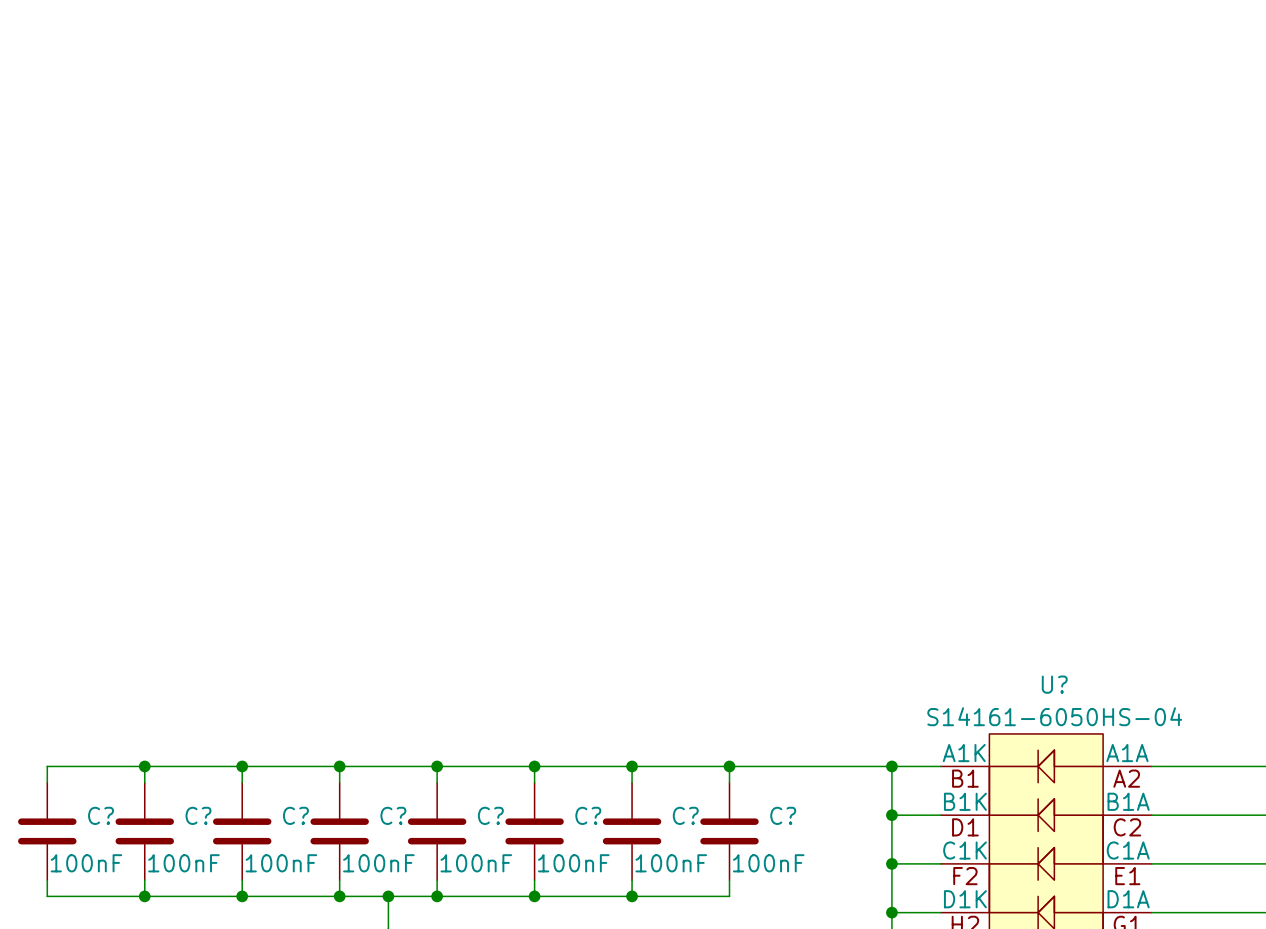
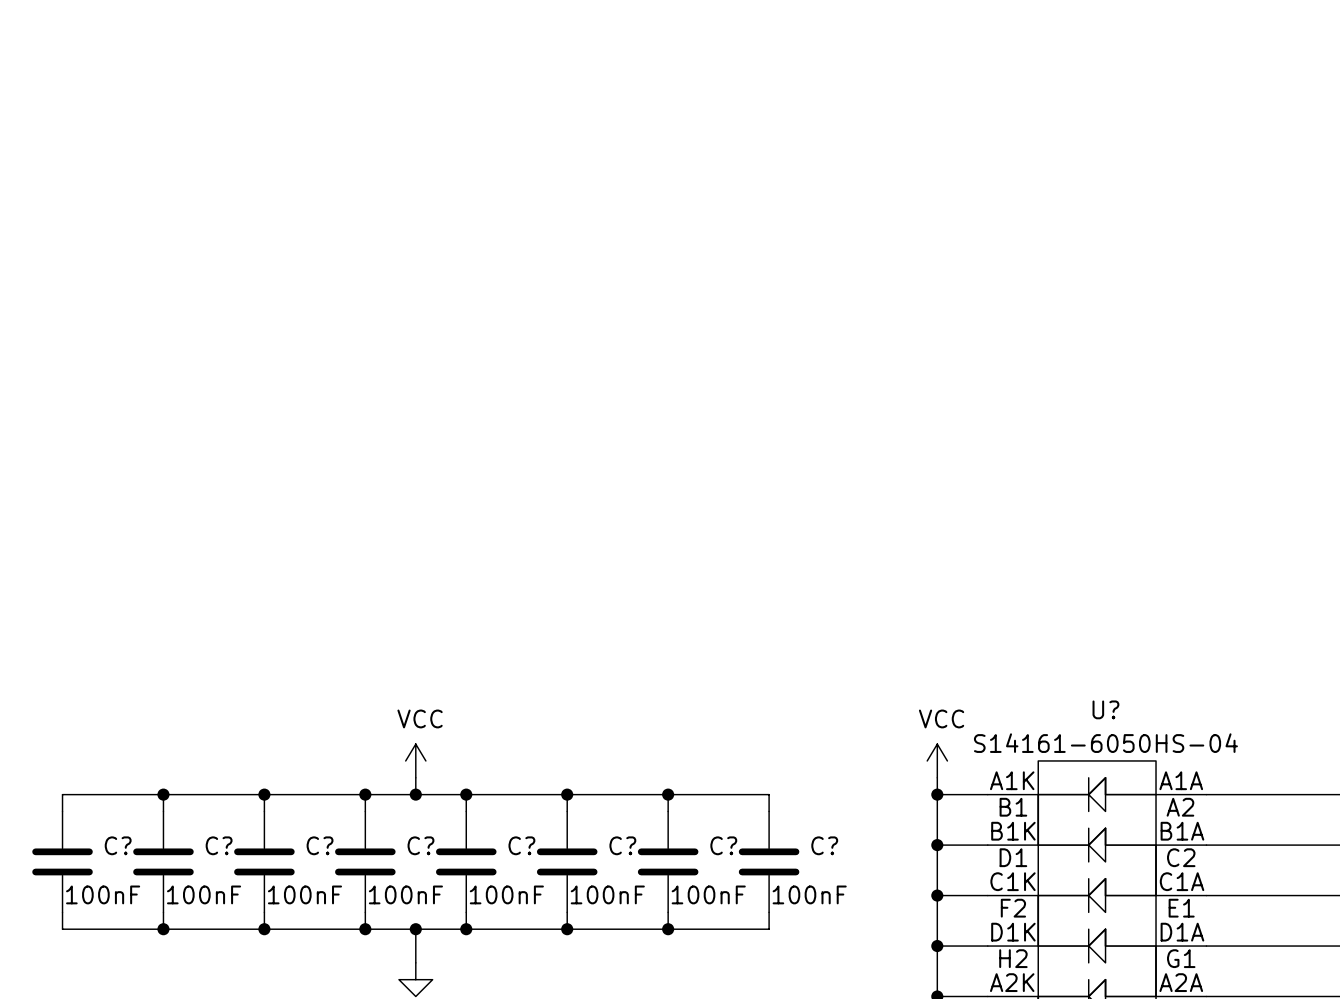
power symbol: none -> VCC (415, 760)
power symbol: none -> VCC (937, 760)
wire: none -> (415, 777) (415, 794)
junction: none -> (415, 794)
wire: (729, 766) (891, 766) -> (937, 777) (937, 794)
junction: (729, 766) -> none

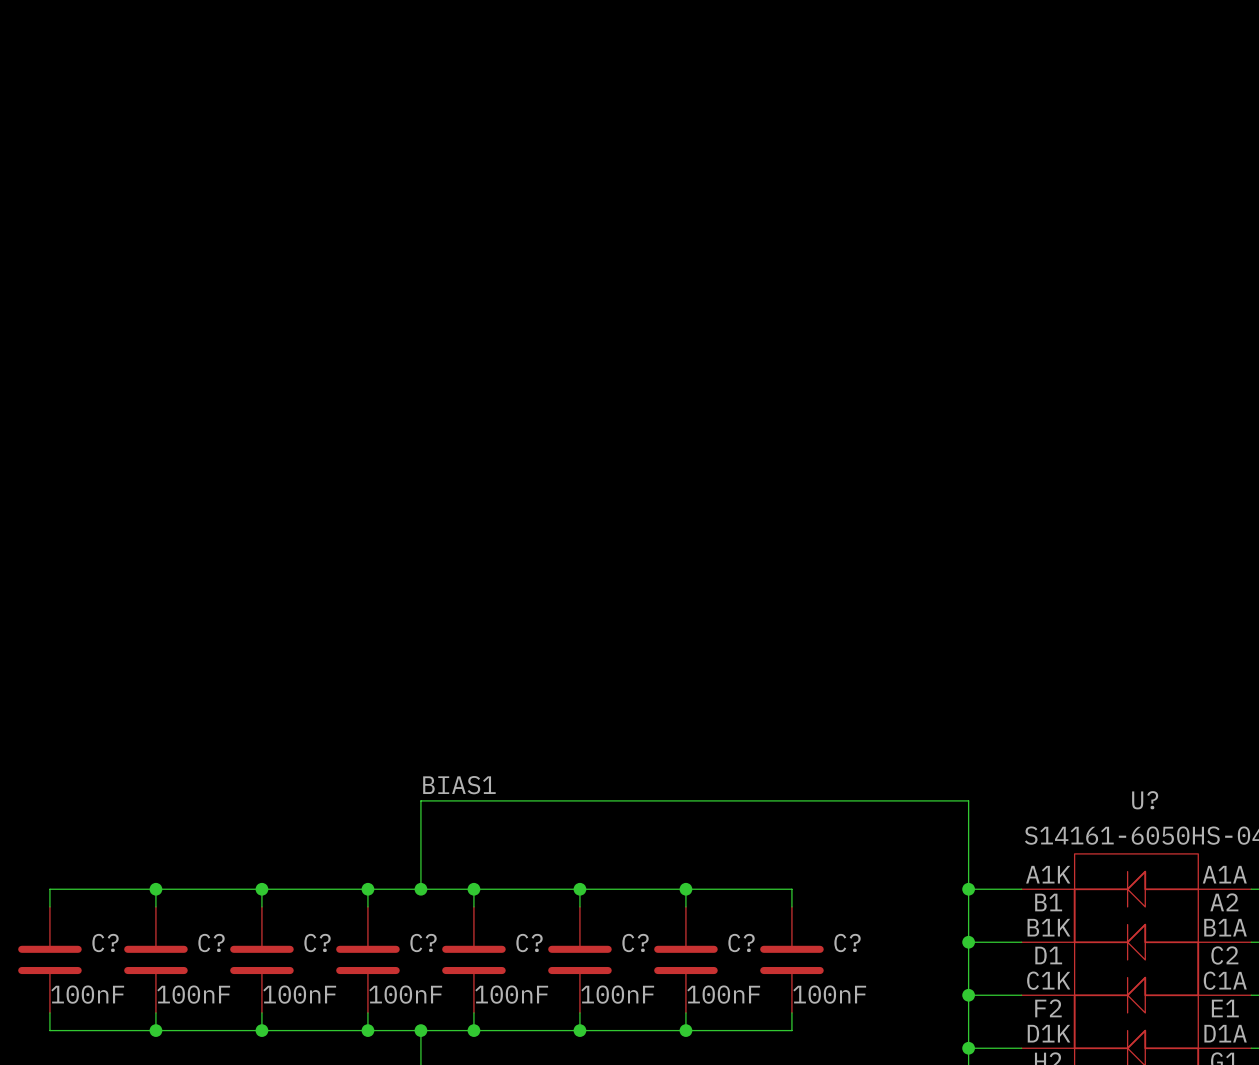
label: none -> BIAS1 (459, 785)
power symbol: VCC (415, 760) -> none
power symbol: VCC (937, 760) -> none
wire: none -> (420, 871) (420, 800) (968, 800) (968, 871)

